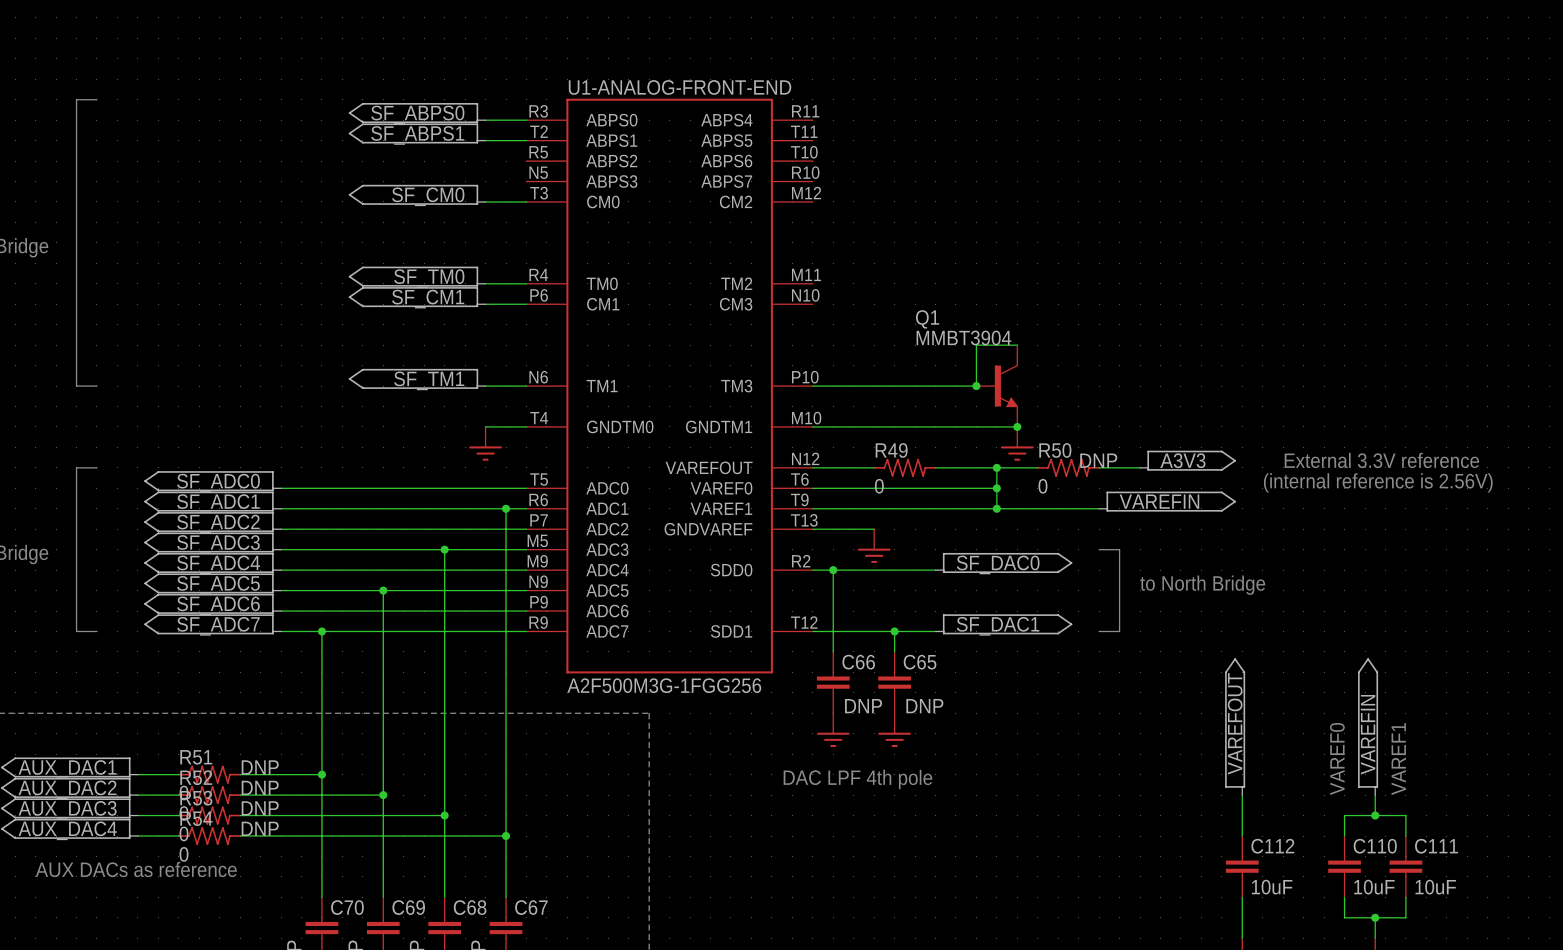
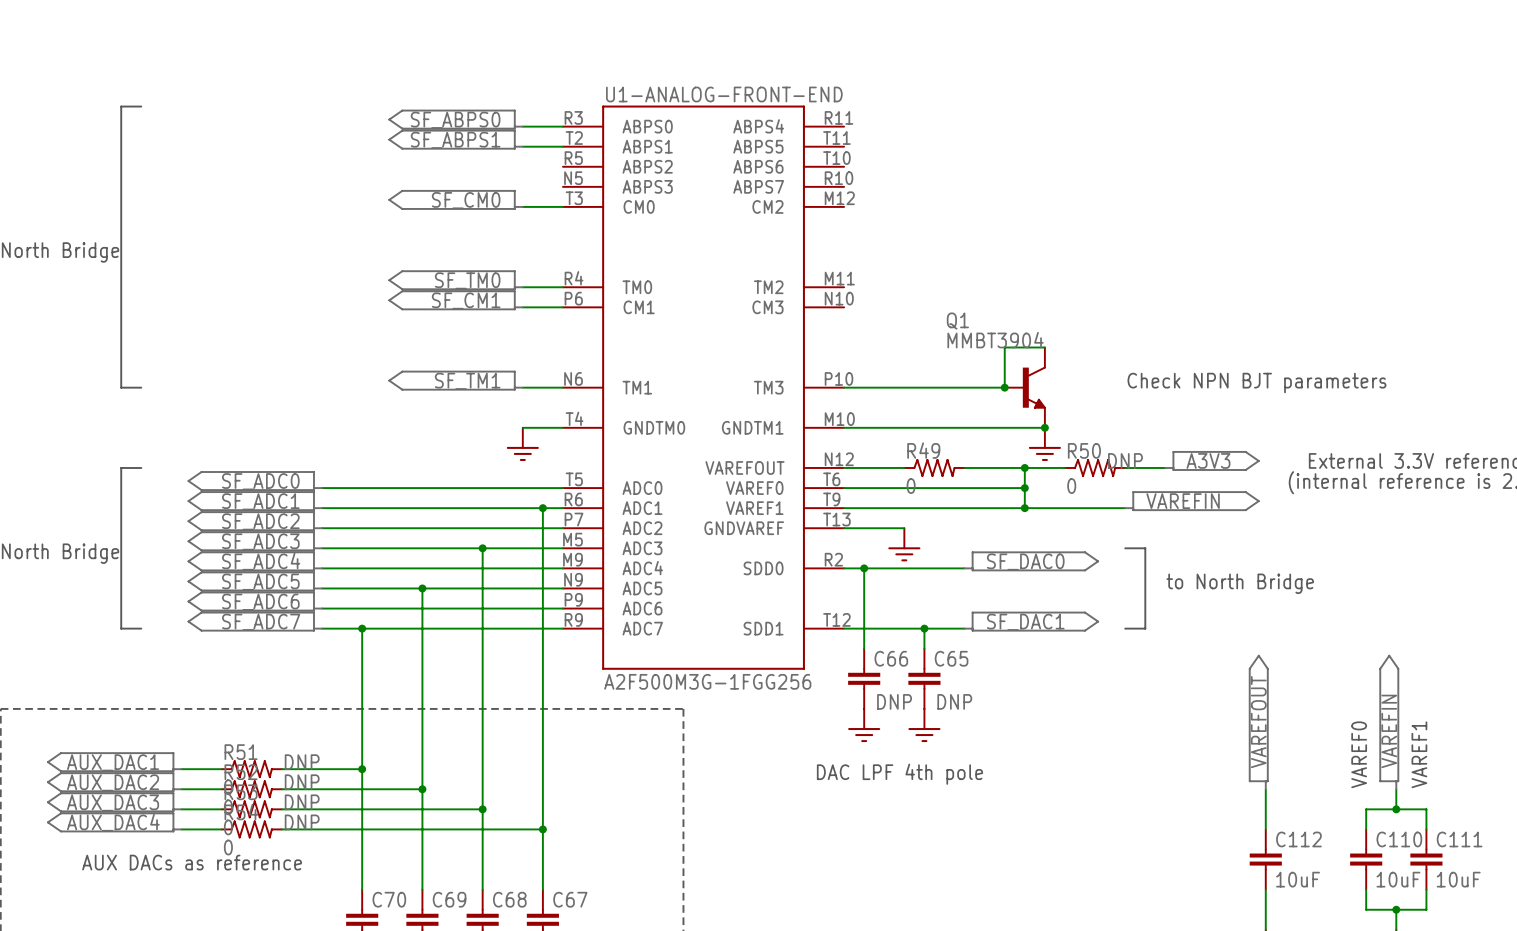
text: none -> Check NPN BJT parameters (1256, 382)

